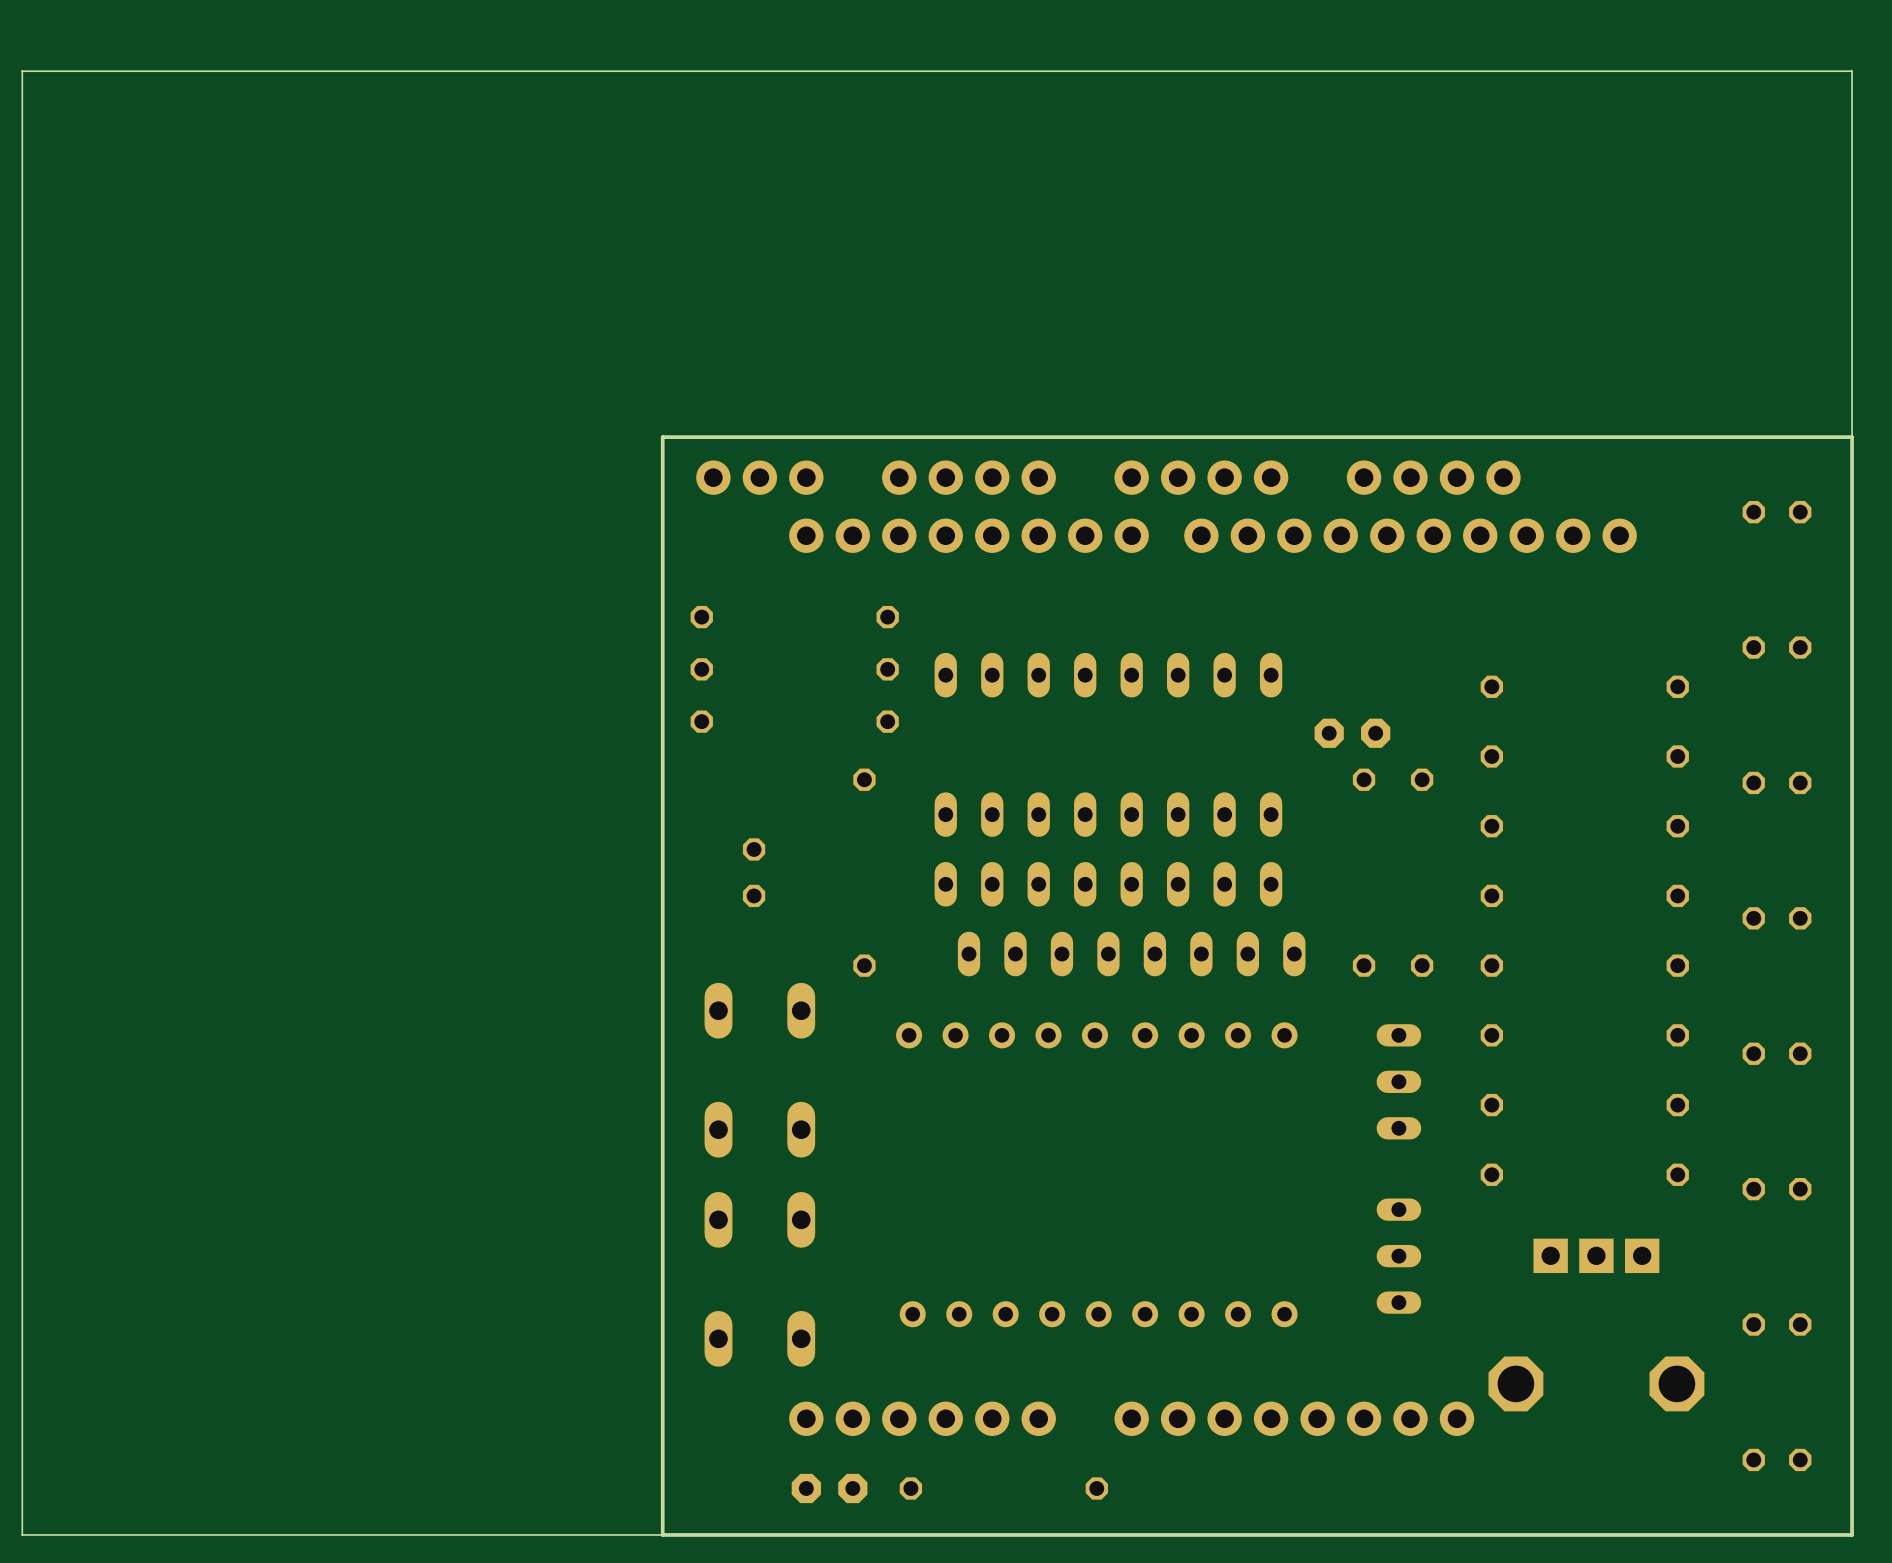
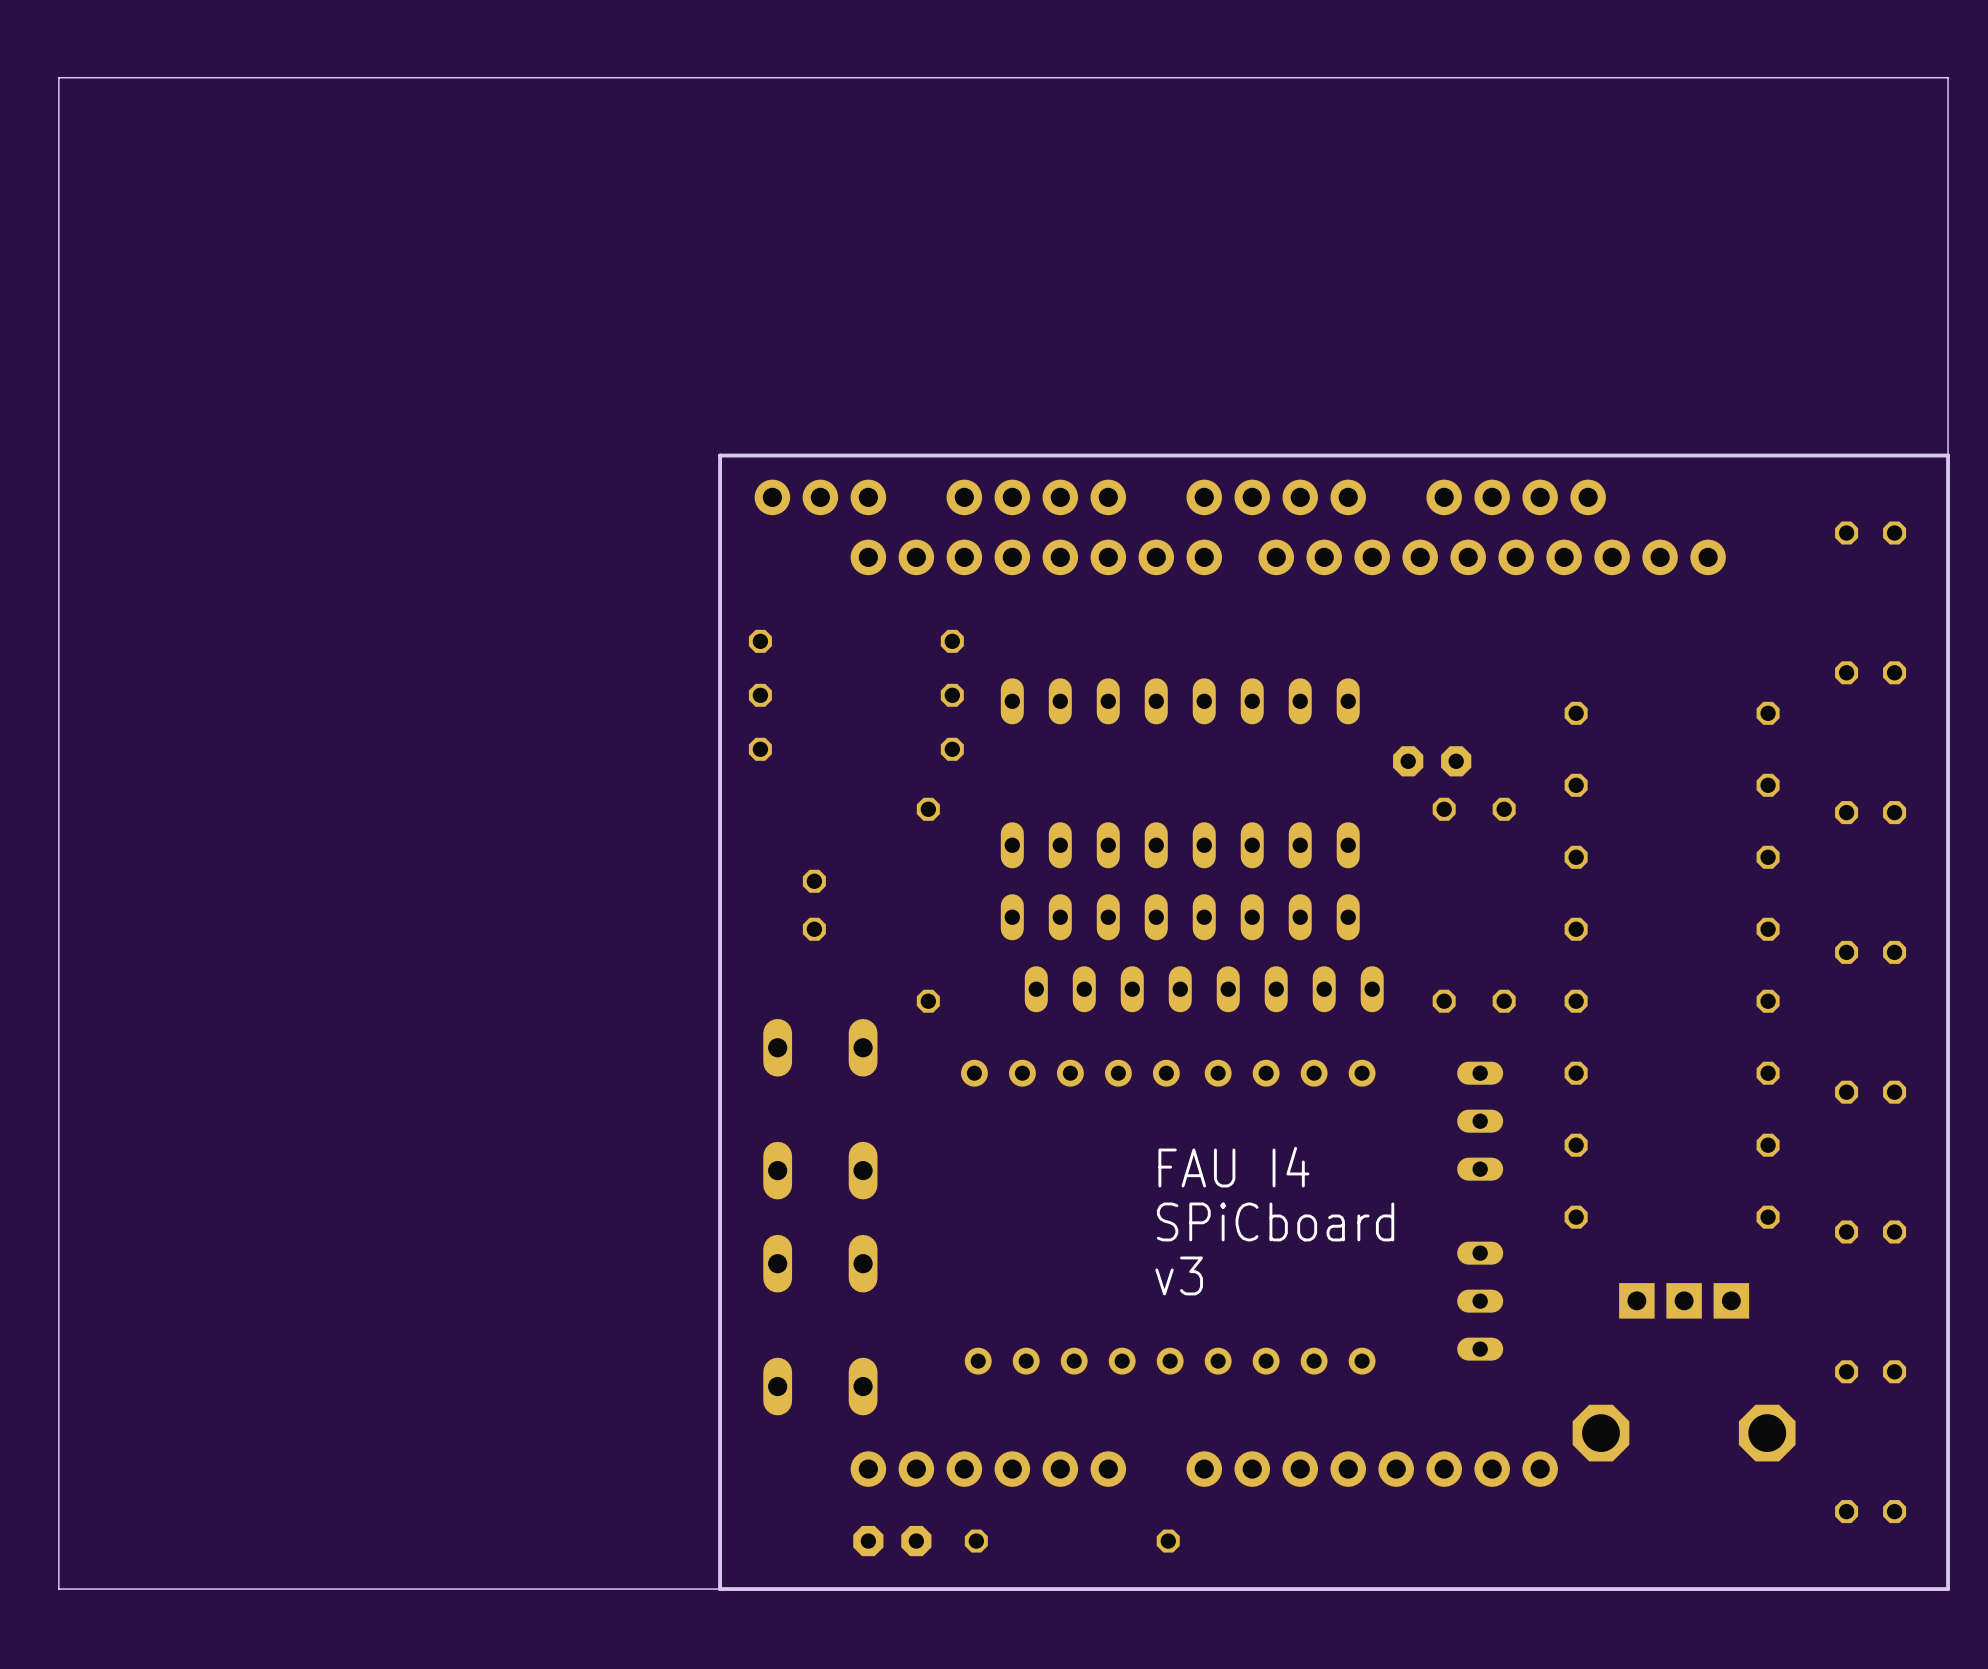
text: none -> FAU I4 (1233, 1167)
text: none -> SPiCboard (1275, 1221)
text: none -> v3 (1179, 1275)

